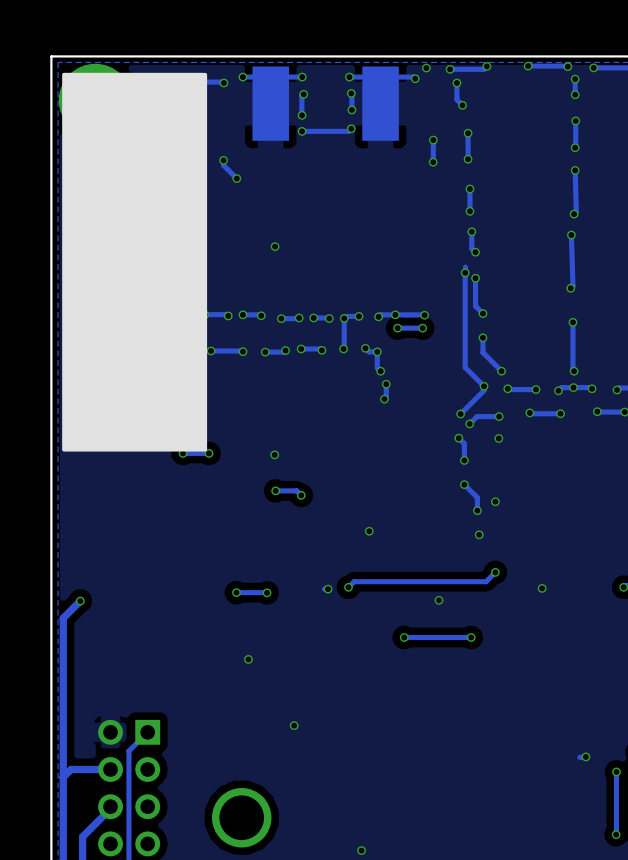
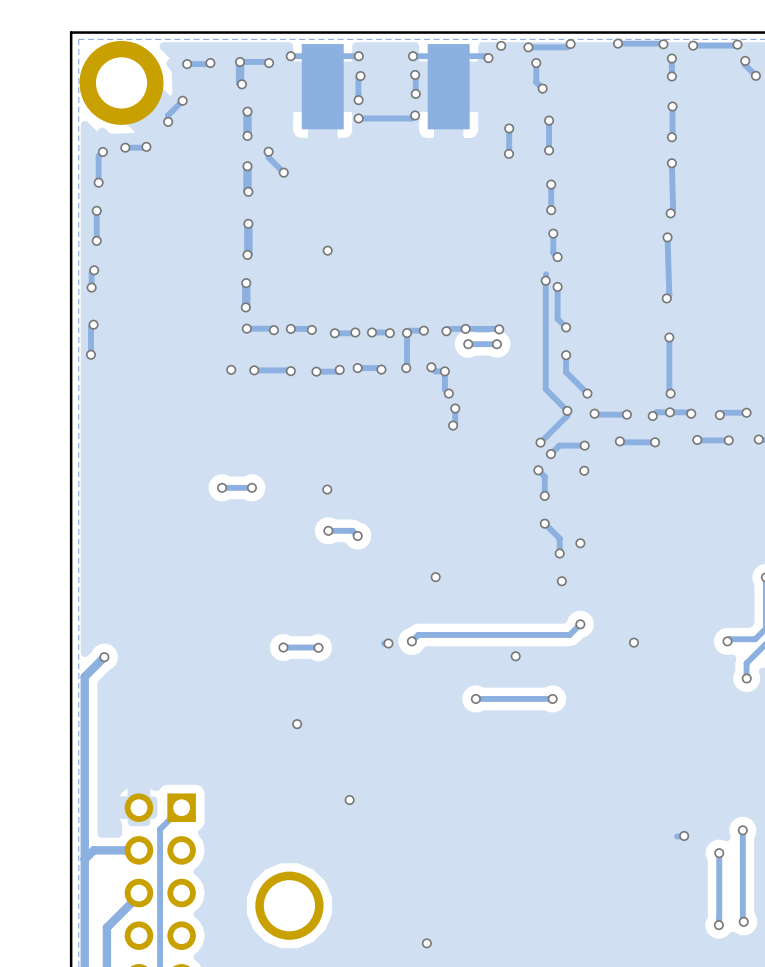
drawing: [62, 72, 208, 452] -> none
track: none -> (240, 61) (240, 82) (241, 84)
via: none -> (241, 84)
track: none -> (247, 111) (247, 135)
via: none -> (247, 111)
via: none -> (247, 135)
track: none -> (247, 166) (248, 191)
via: none -> (247, 166)
via: none -> (248, 191)
track: none -> (248, 223) (247, 254)
via: none -> (248, 223)
via: none -> (247, 254)
track: none -> (246, 283) (245, 307)
via: none -> (246, 283)
via: none -> (245, 307)

